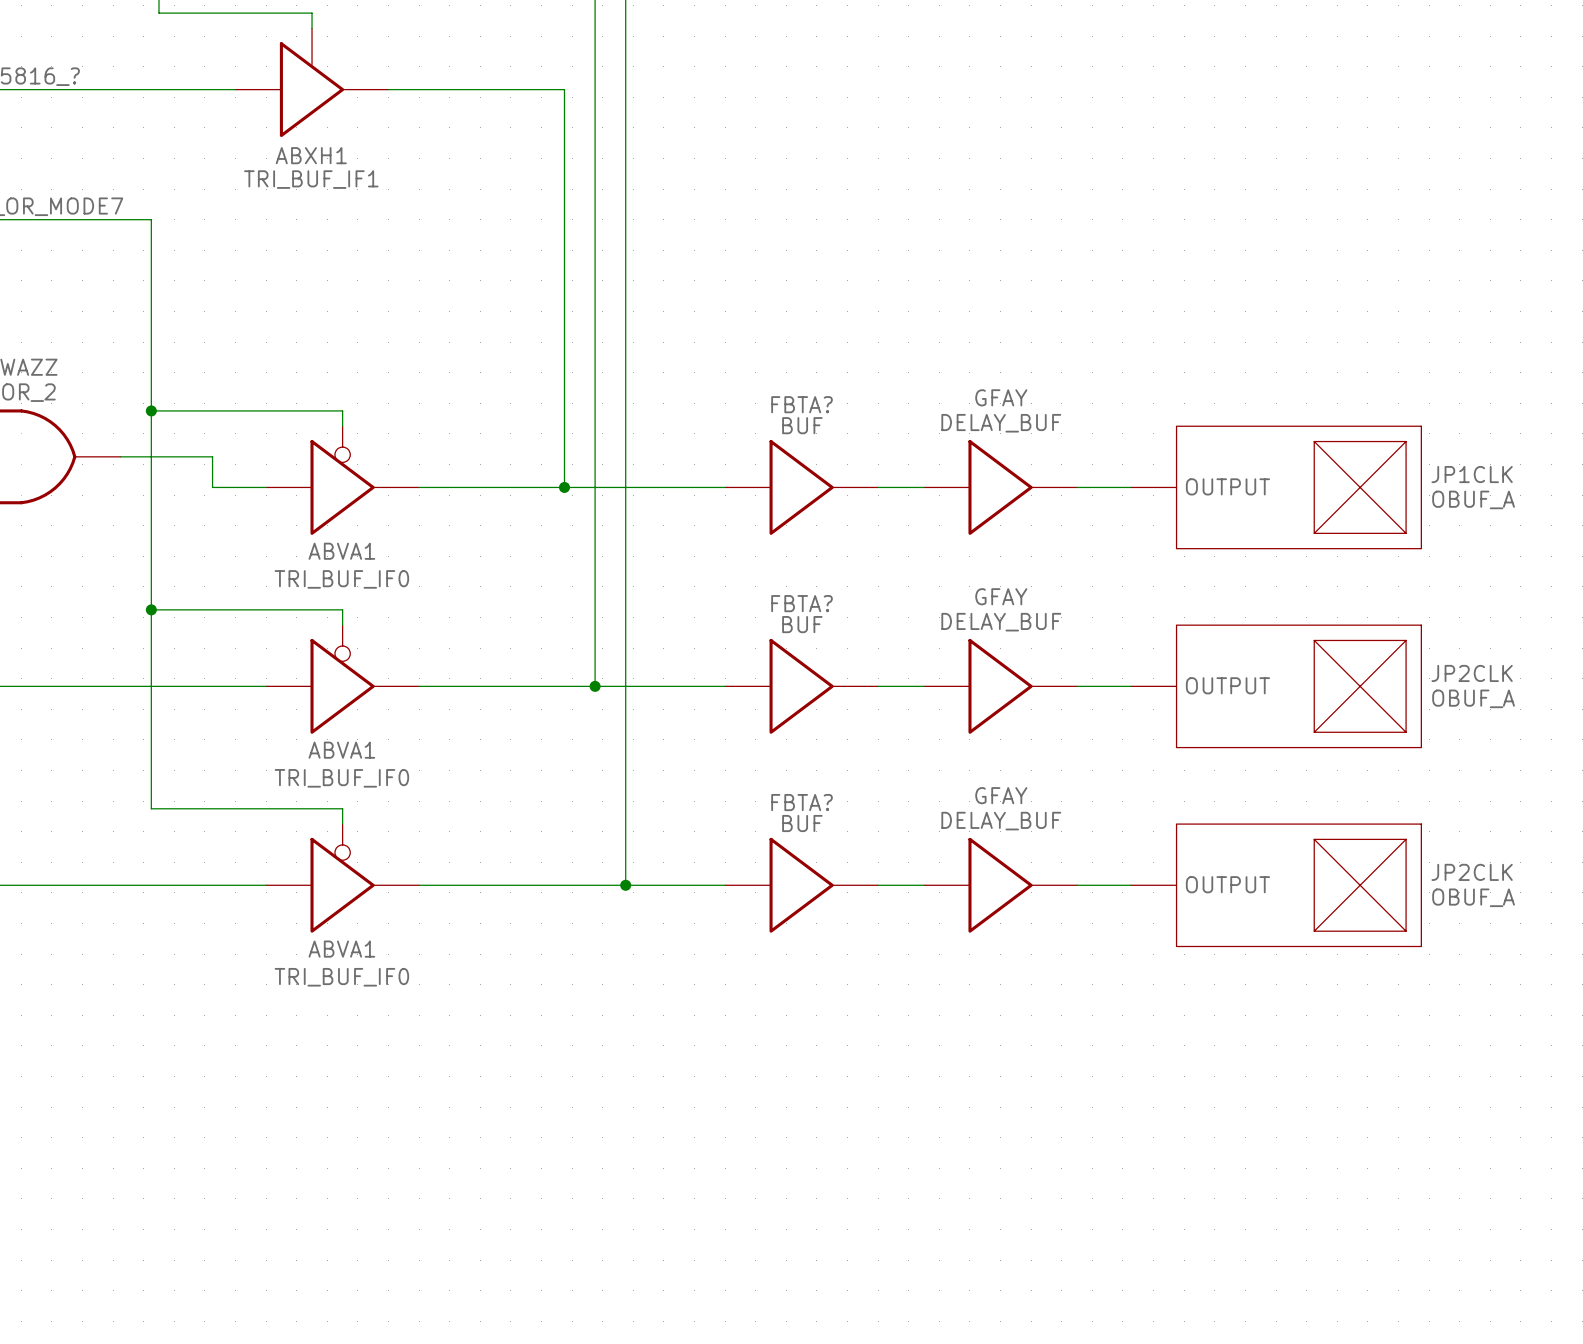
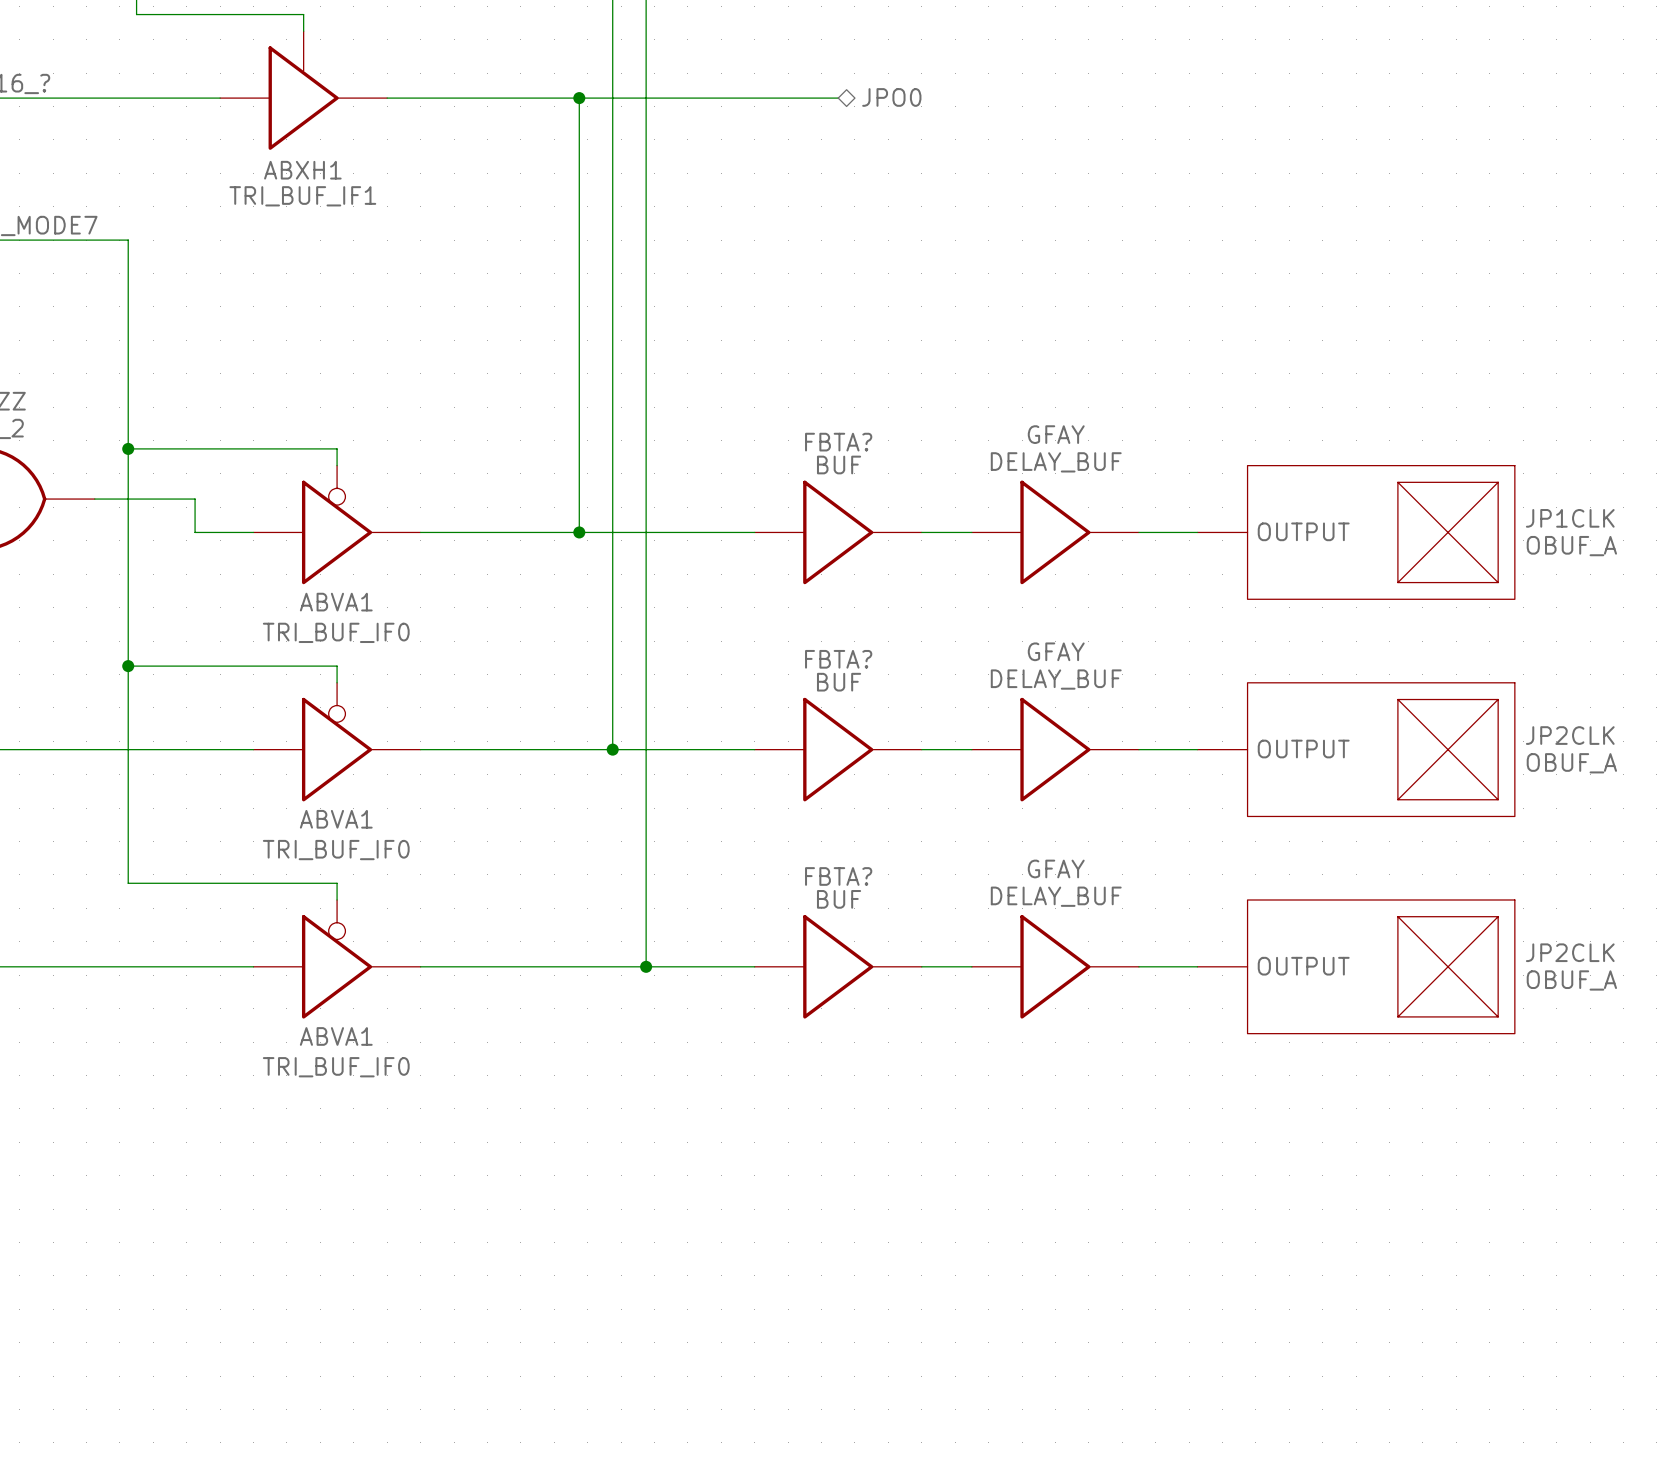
wire: none -> (579, 98) (838, 98)
junction: none -> (579, 98)
hierarchical label: none -> JPO0 (891, 97)

